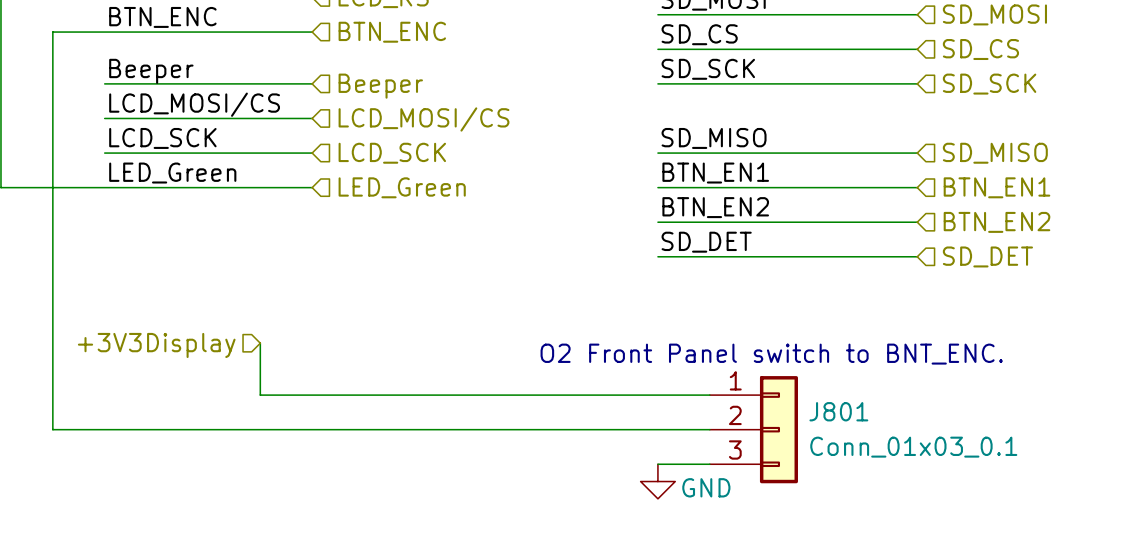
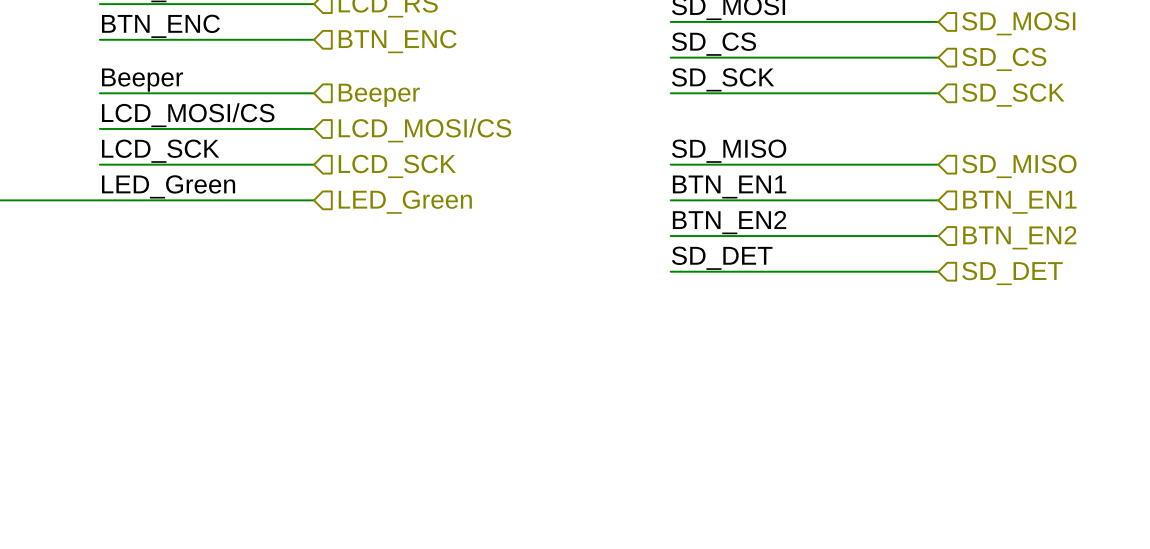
wire: (104, 32) (52, 32) (52, 429) (709, 429) -> none
wire: (260, 343) (260, 395) (709, 395) -> none
hierarchical label: +3V3Display (156, 345) -> none
text: O2 Front Panel switch to BNT_ENC. (771, 354) -> none
J801: Conn_01x03_0.1 (753, 429) -> none
wire: (657, 464) (709, 464) -> none
power symbol: GND (657, 481) -> none

